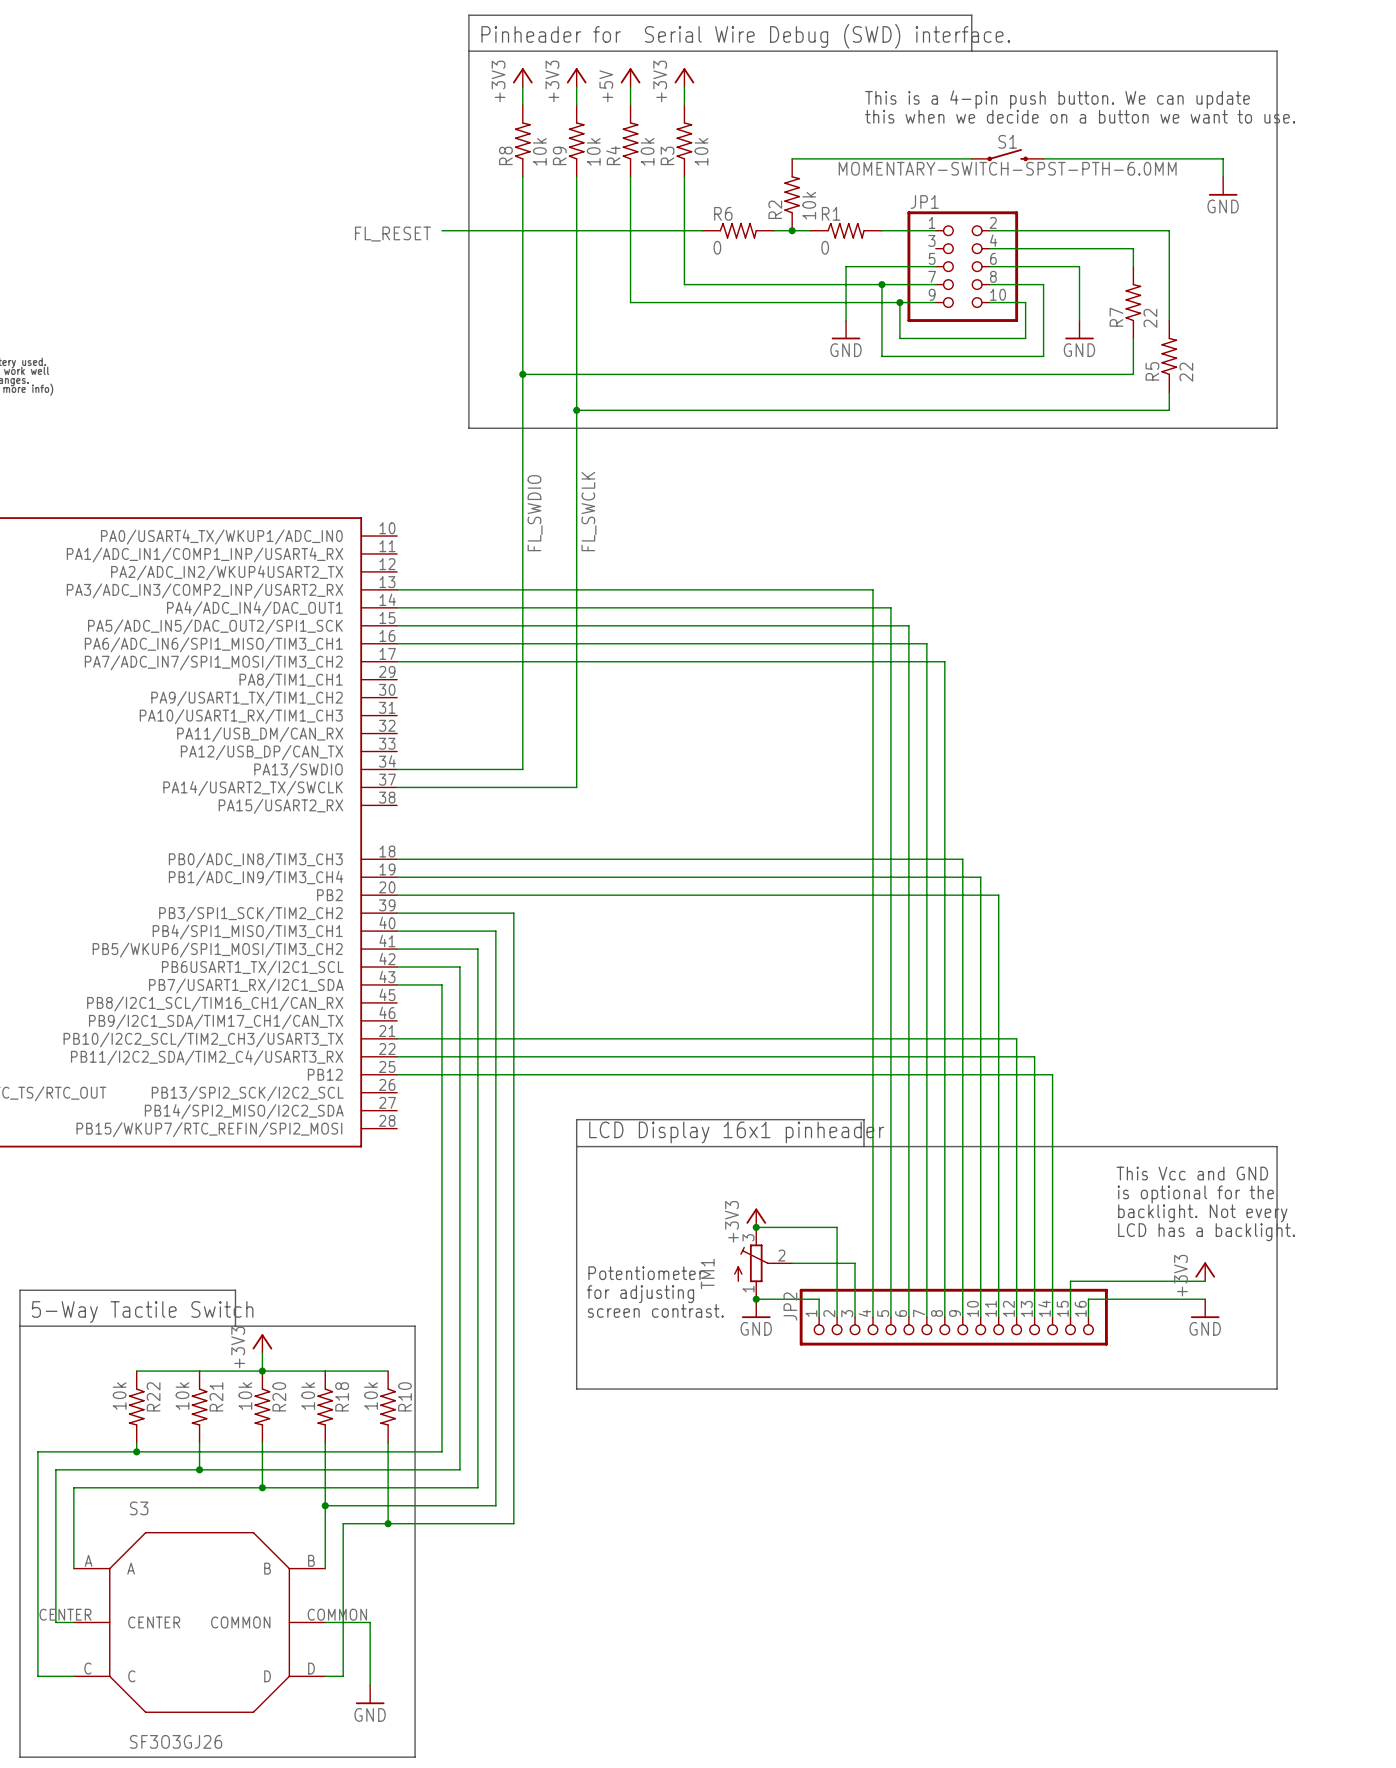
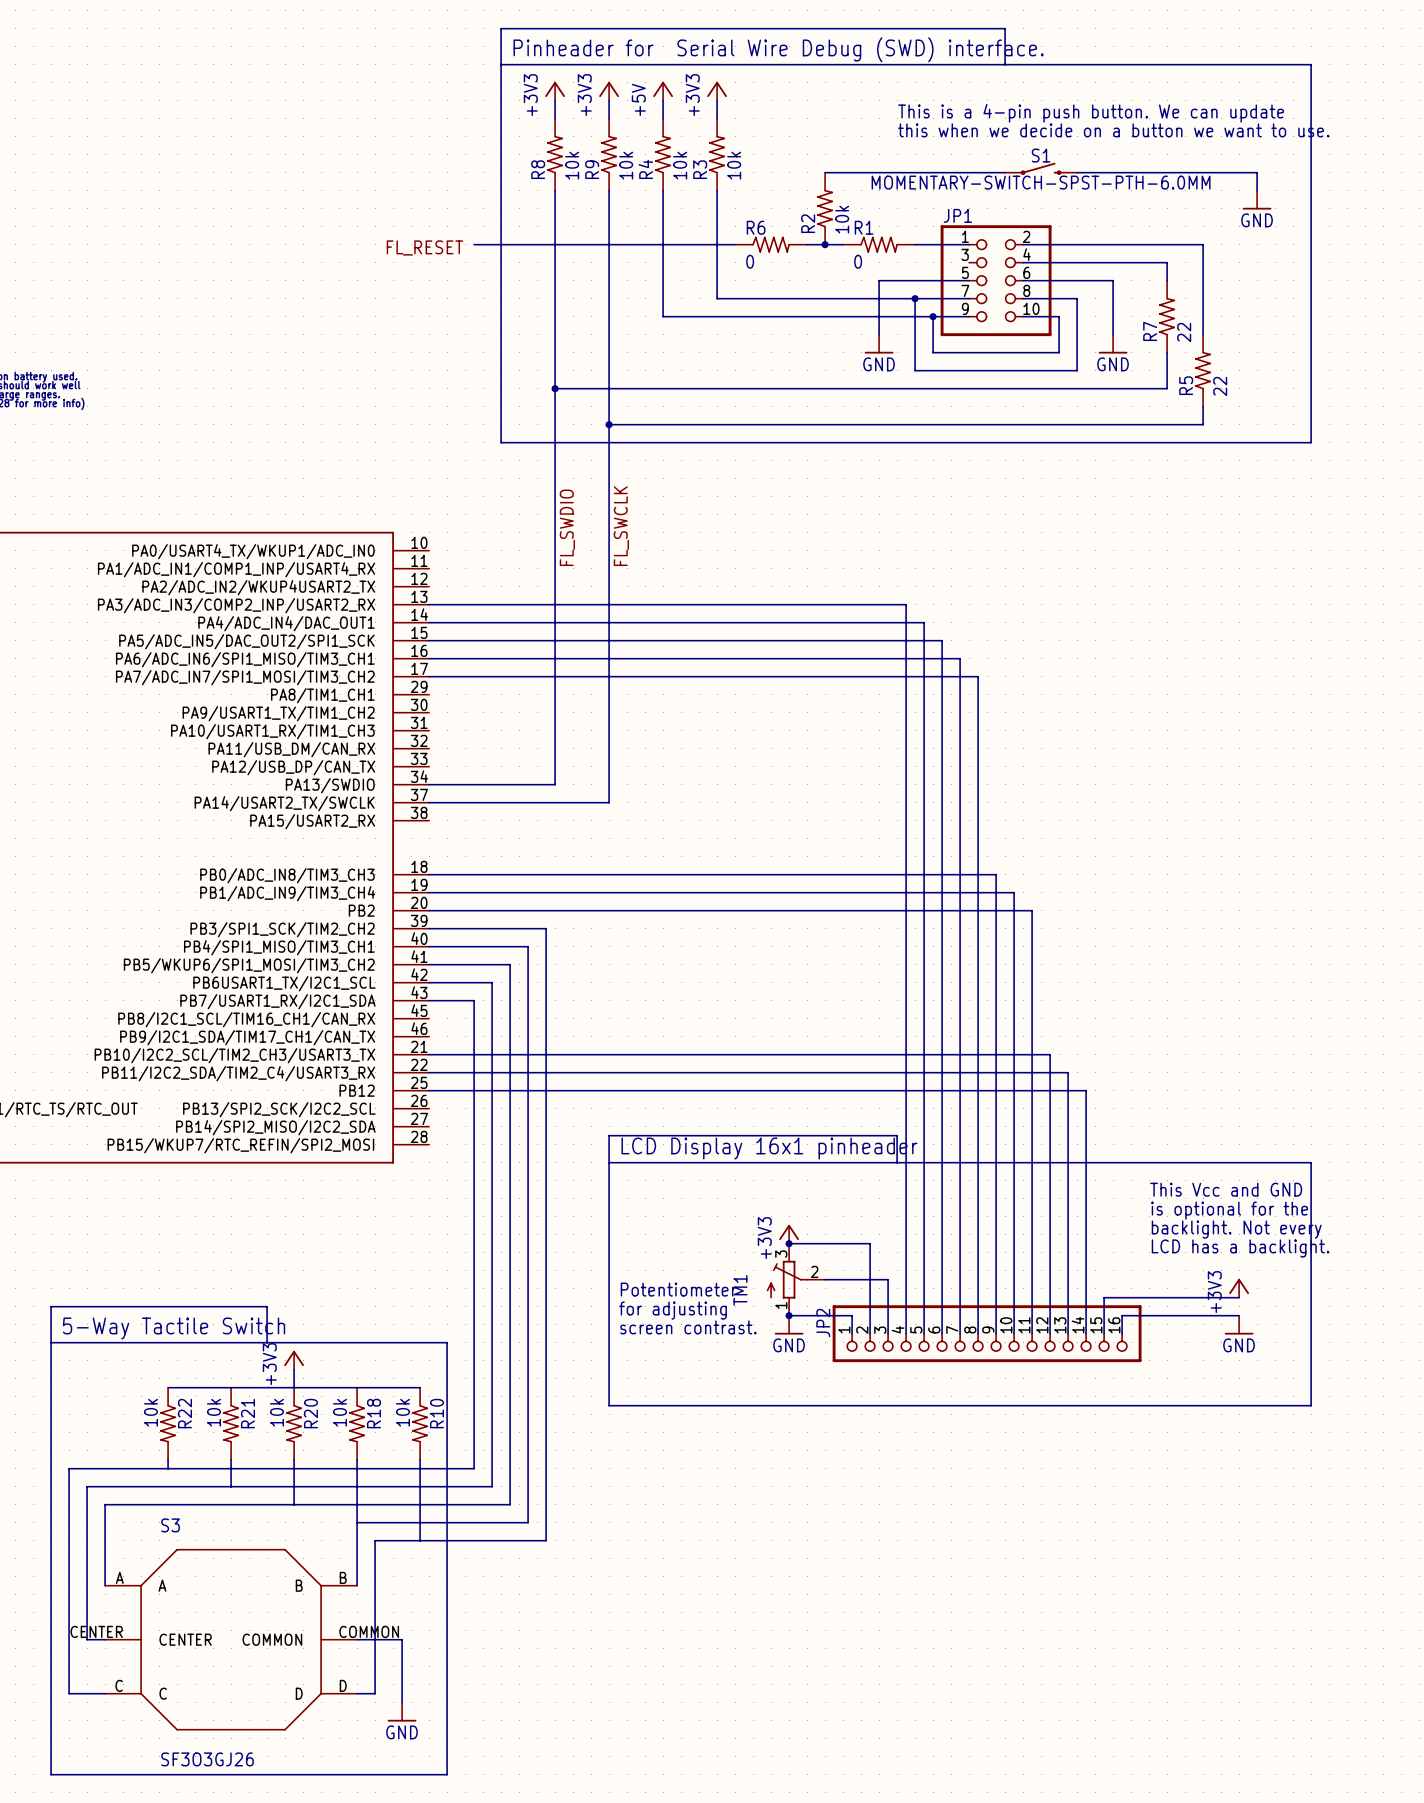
junction: (262, 1371) -> none
junction: (136, 1451) -> none
junction: (199, 1469) -> none
junction: (262, 1487) -> none
junction: (325, 1505) -> none
junction: (388, 1523) -> none

